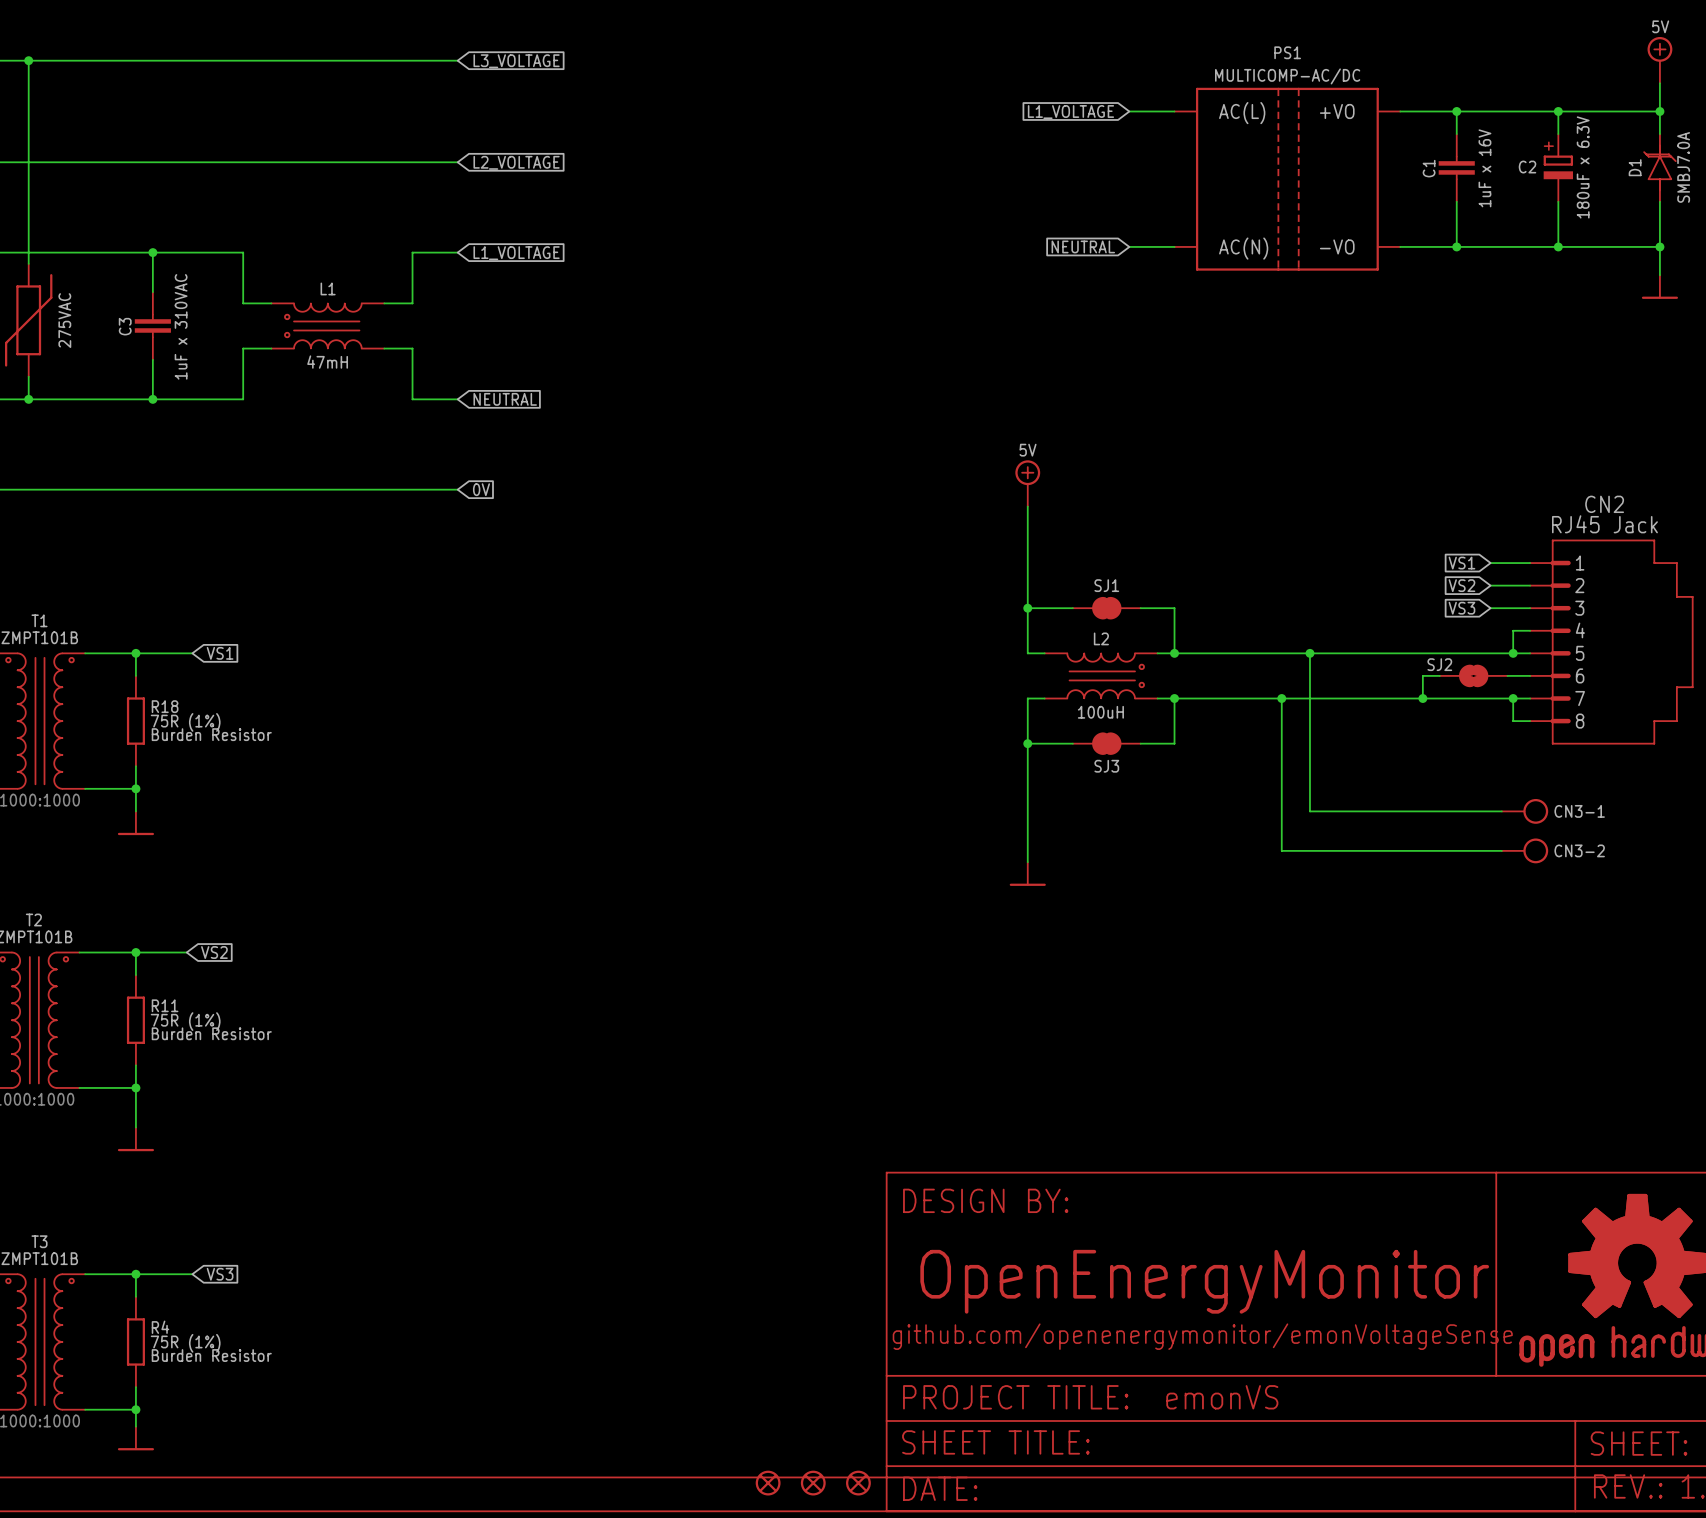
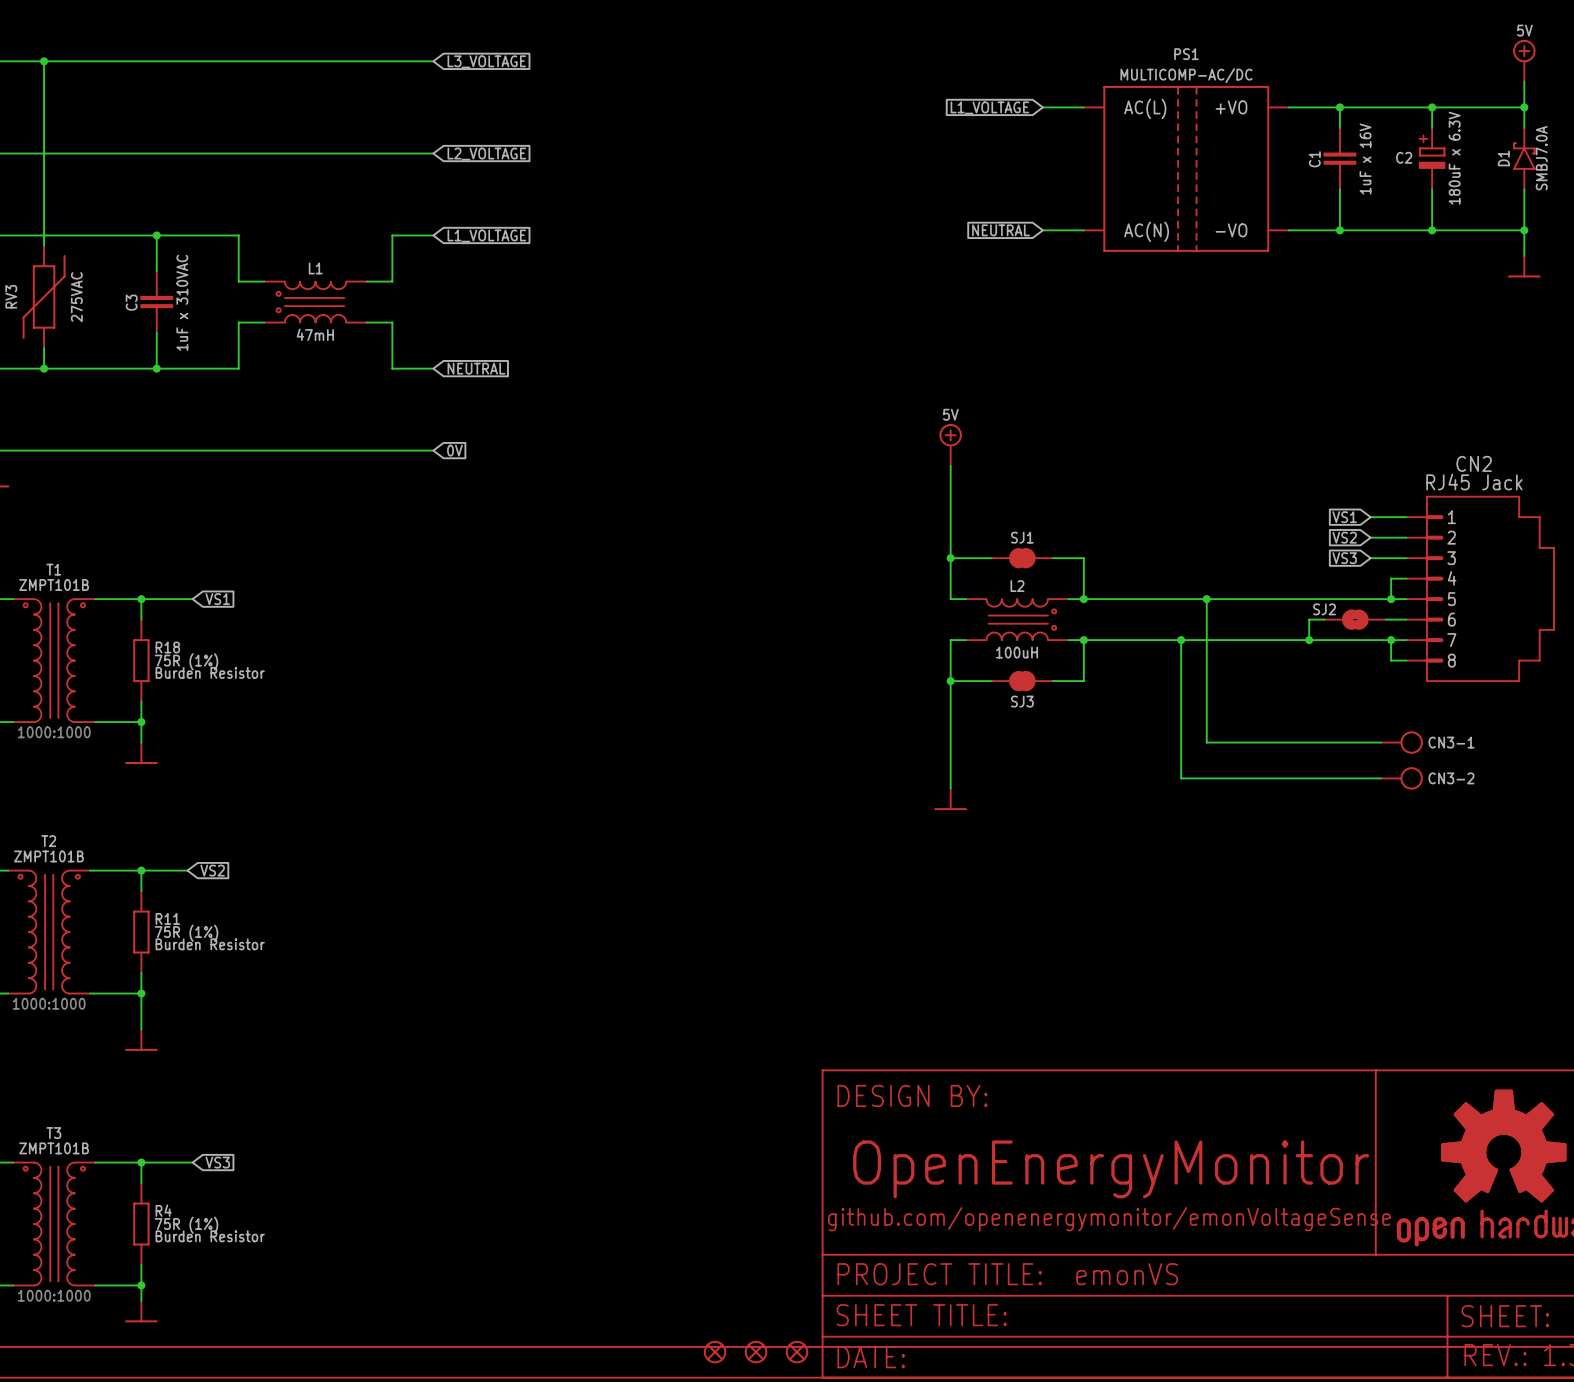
D1 symbol: [1643, 134, 1677, 202] -> [1513, 127, 1536, 190]

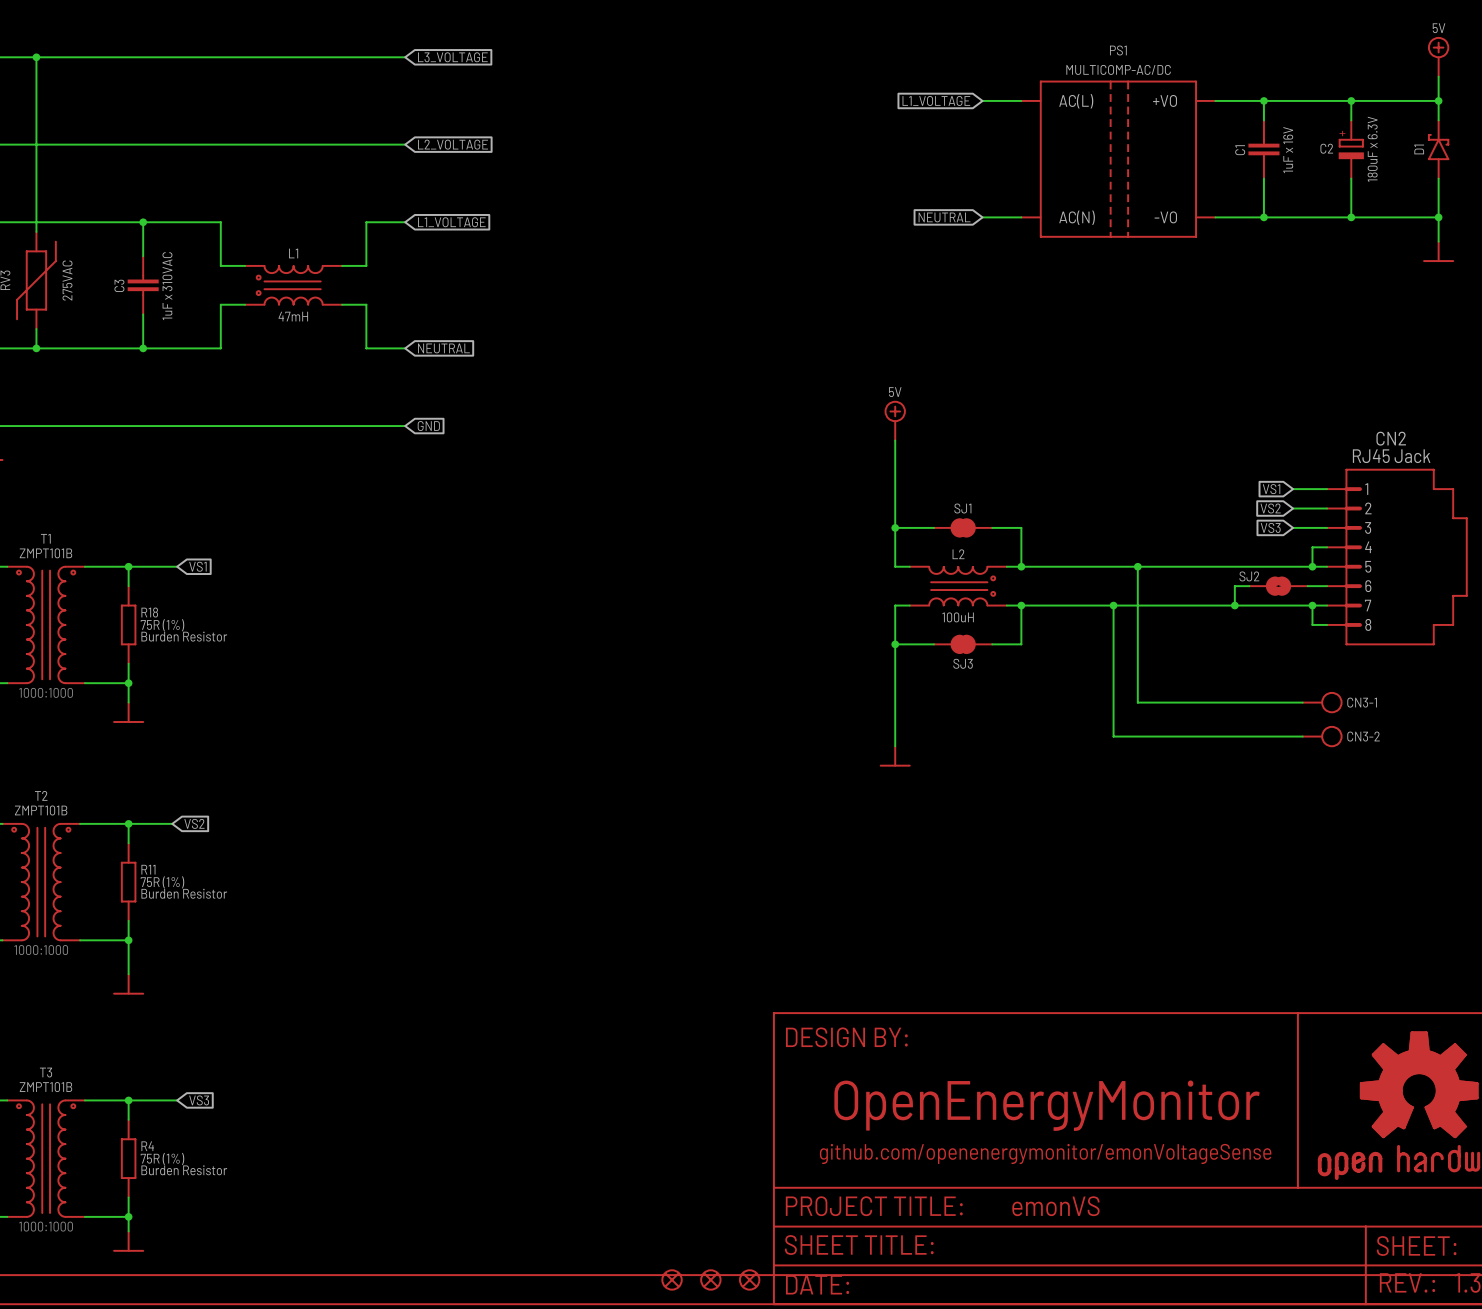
D1 text: SMBJ7.0A (1541, 158) -> none
global label: 0V (454, 450) -> GND (428, 426)

